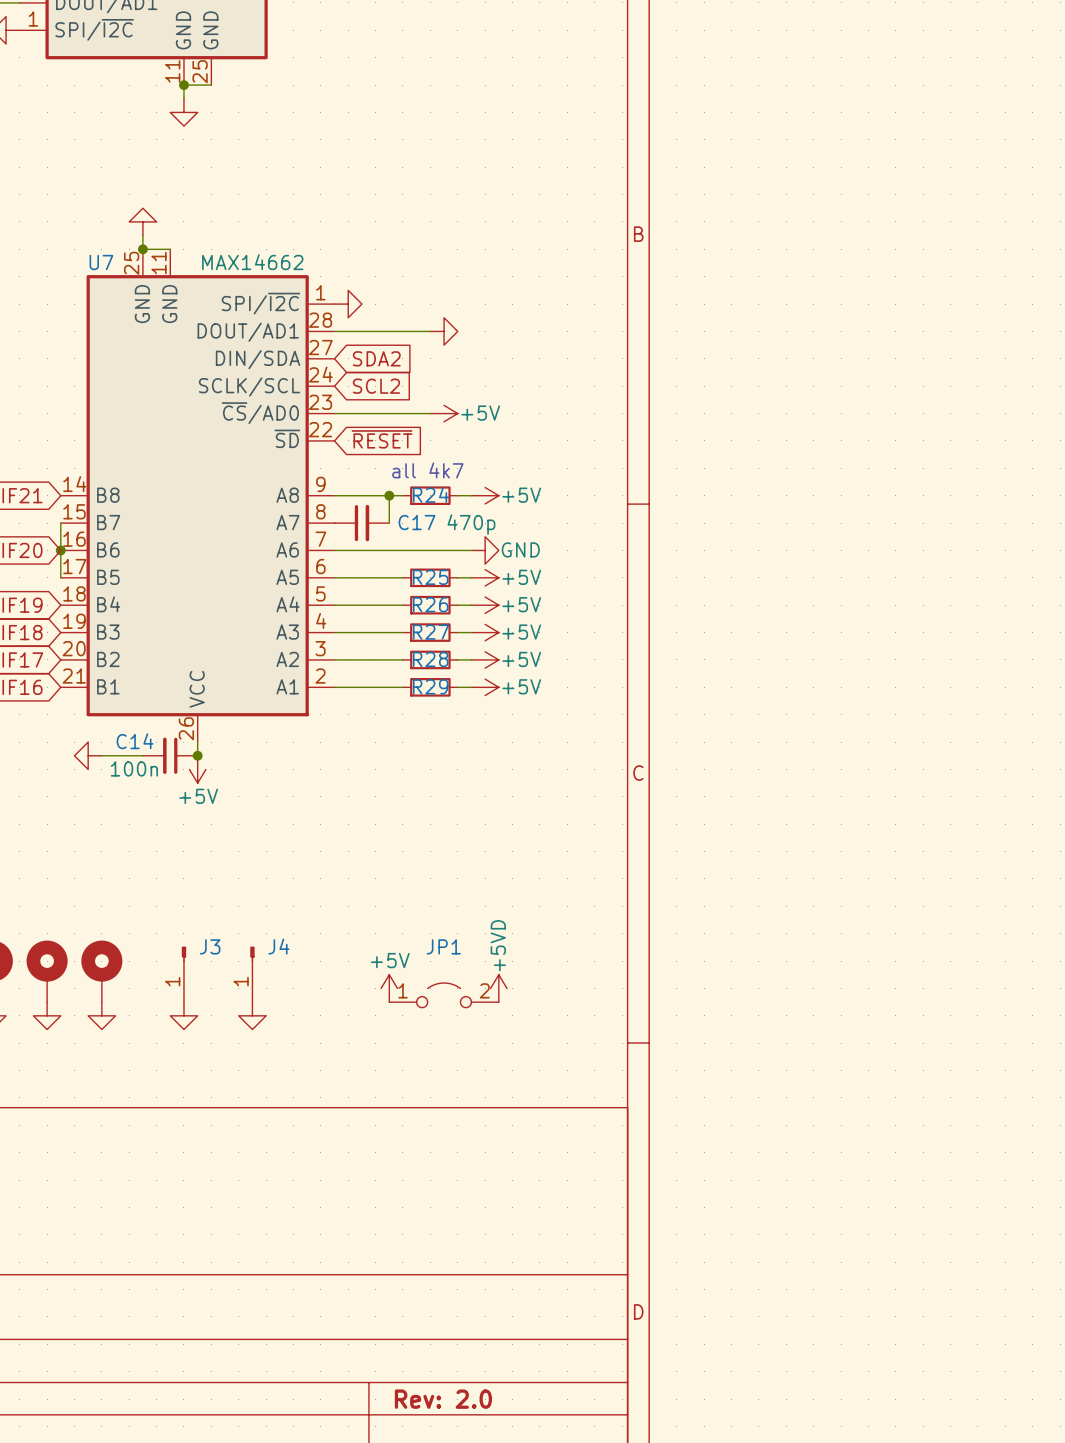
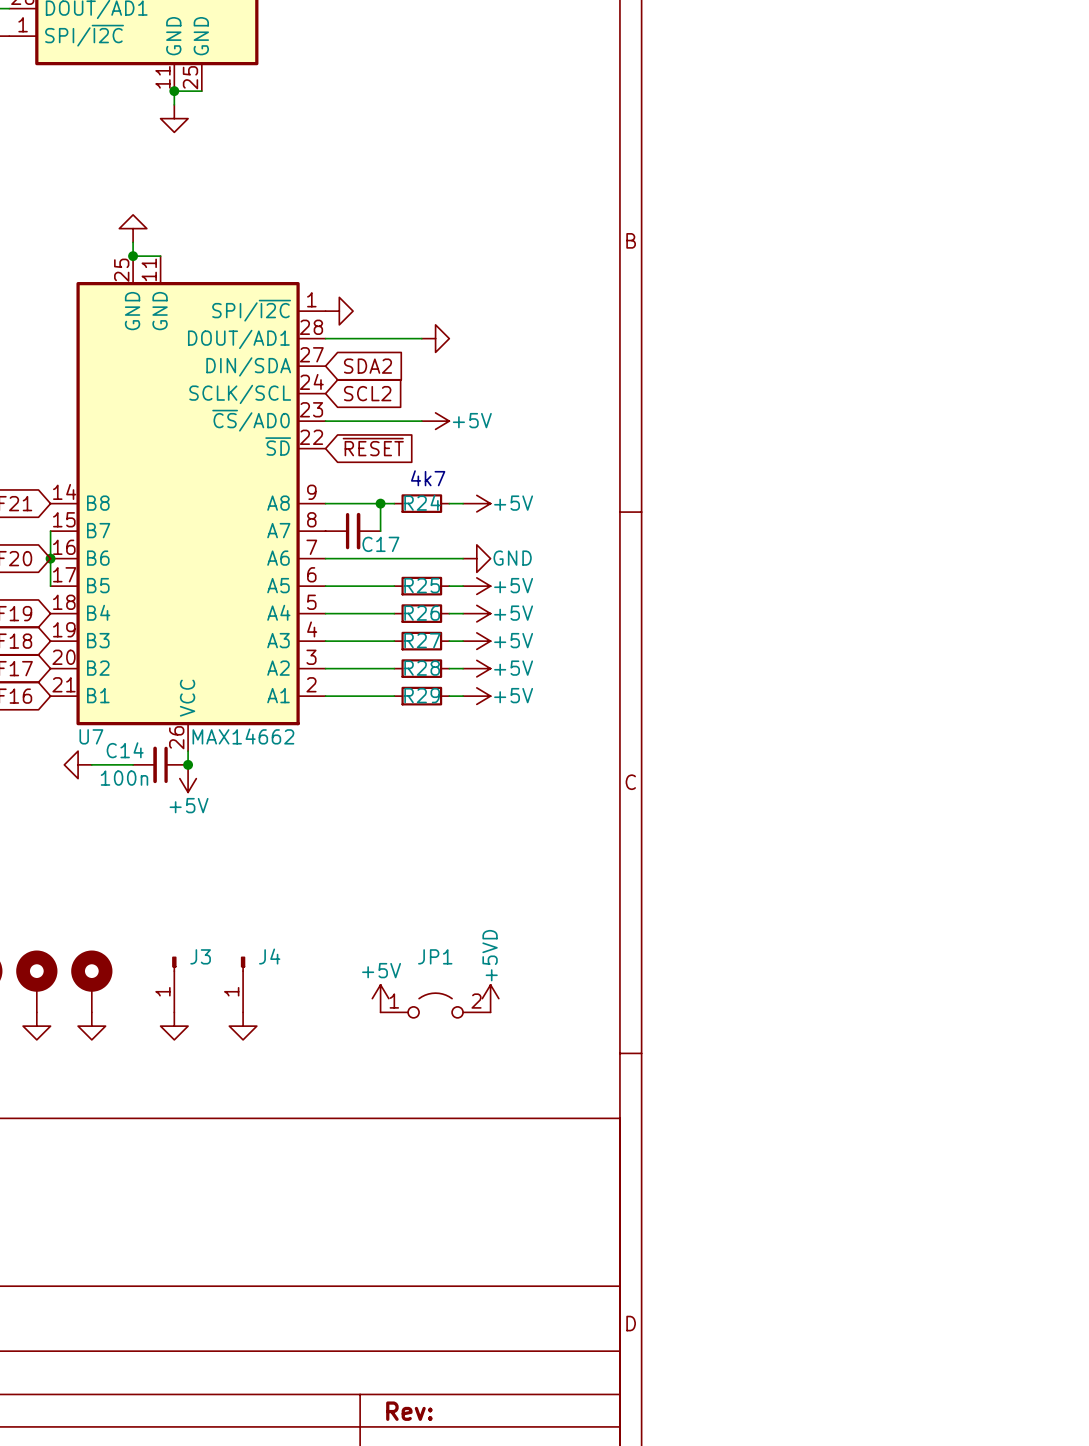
U7 name position: U7 (101, 262) -> U7 (91, 736)
U7 value position: MAX14662 (252, 262) -> MAX14662 (243, 736)
text: all 4k7 (427, 470) -> none
text: none -> 4k7 (428, 478)
C17 name position: C17 (417, 522) -> C17 (380, 544)
C17 value: 470p (471, 524) -> none
title block: Rev: 2.0 (443, 1399) -> Rev: (409, 1411)

